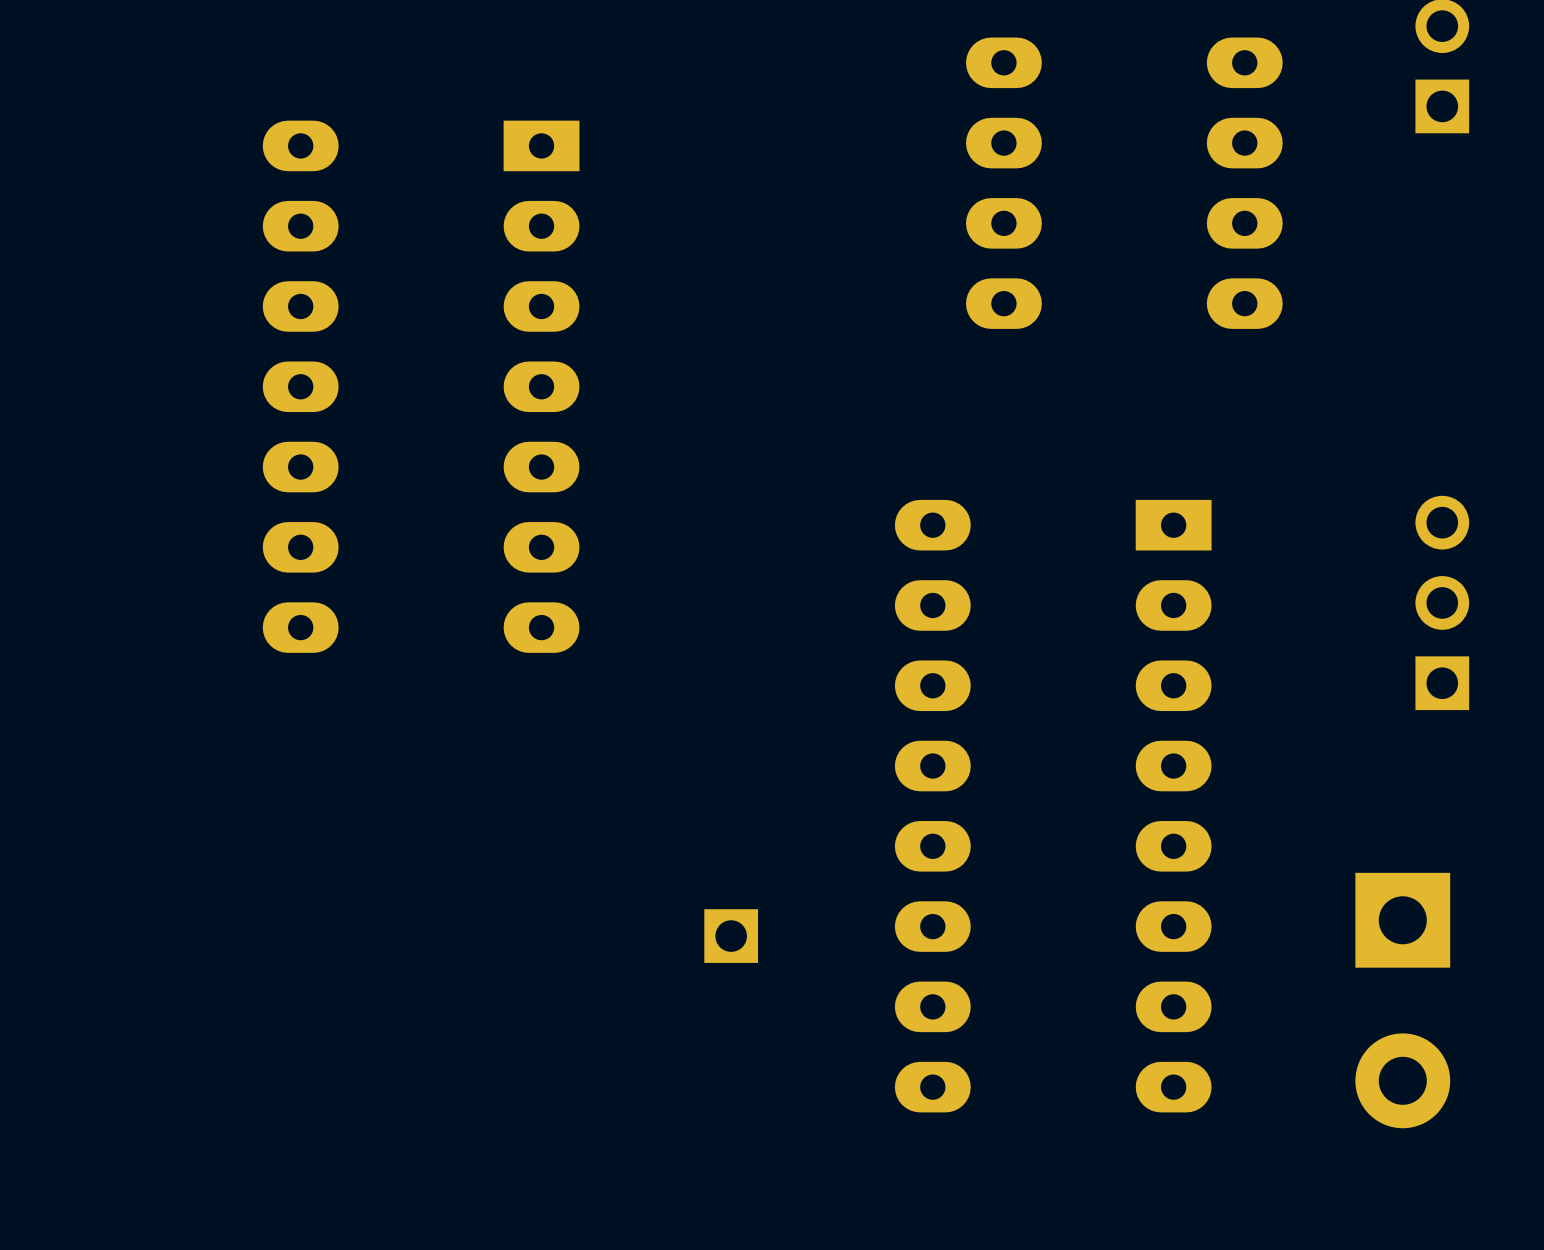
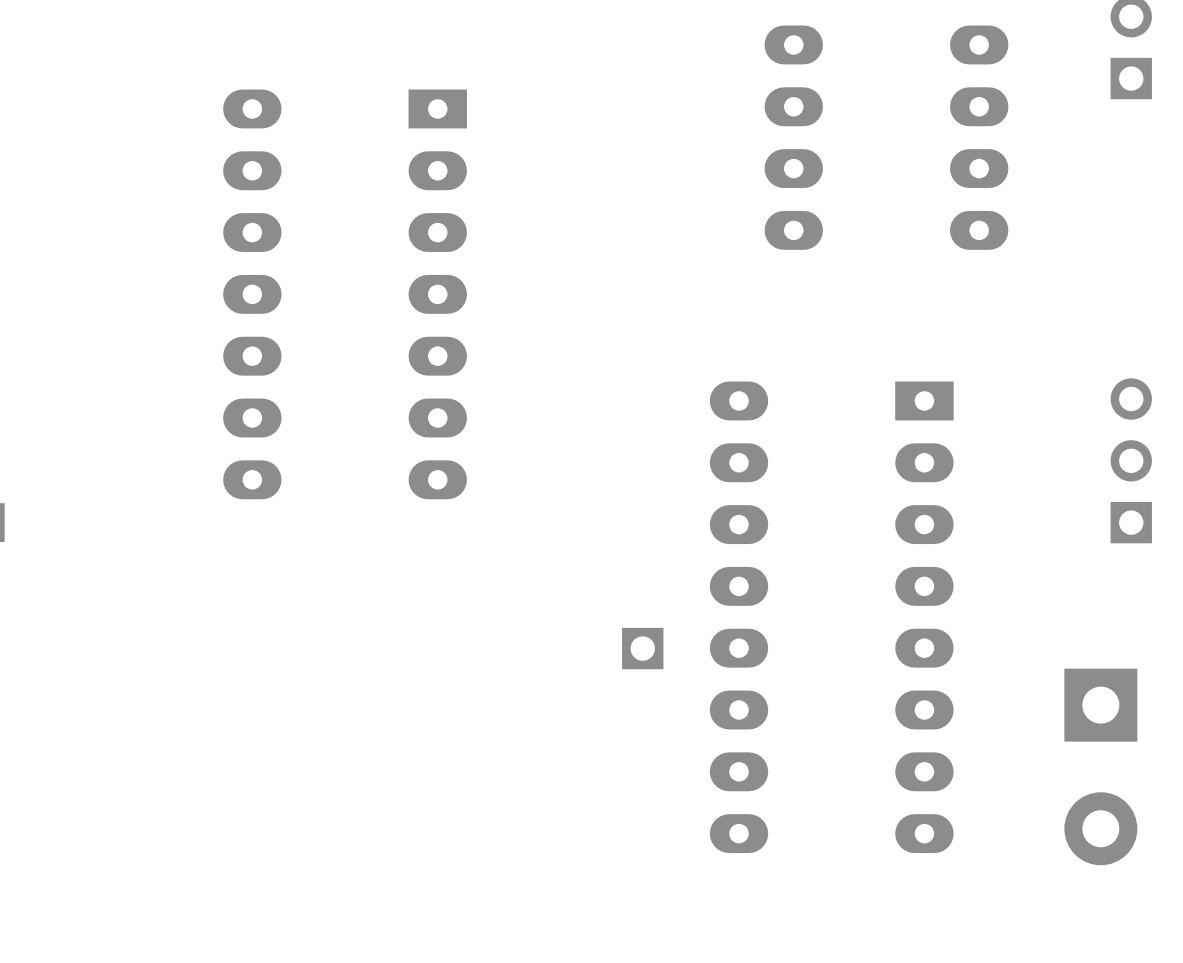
part position: (731, 936) -> (642, 648)

